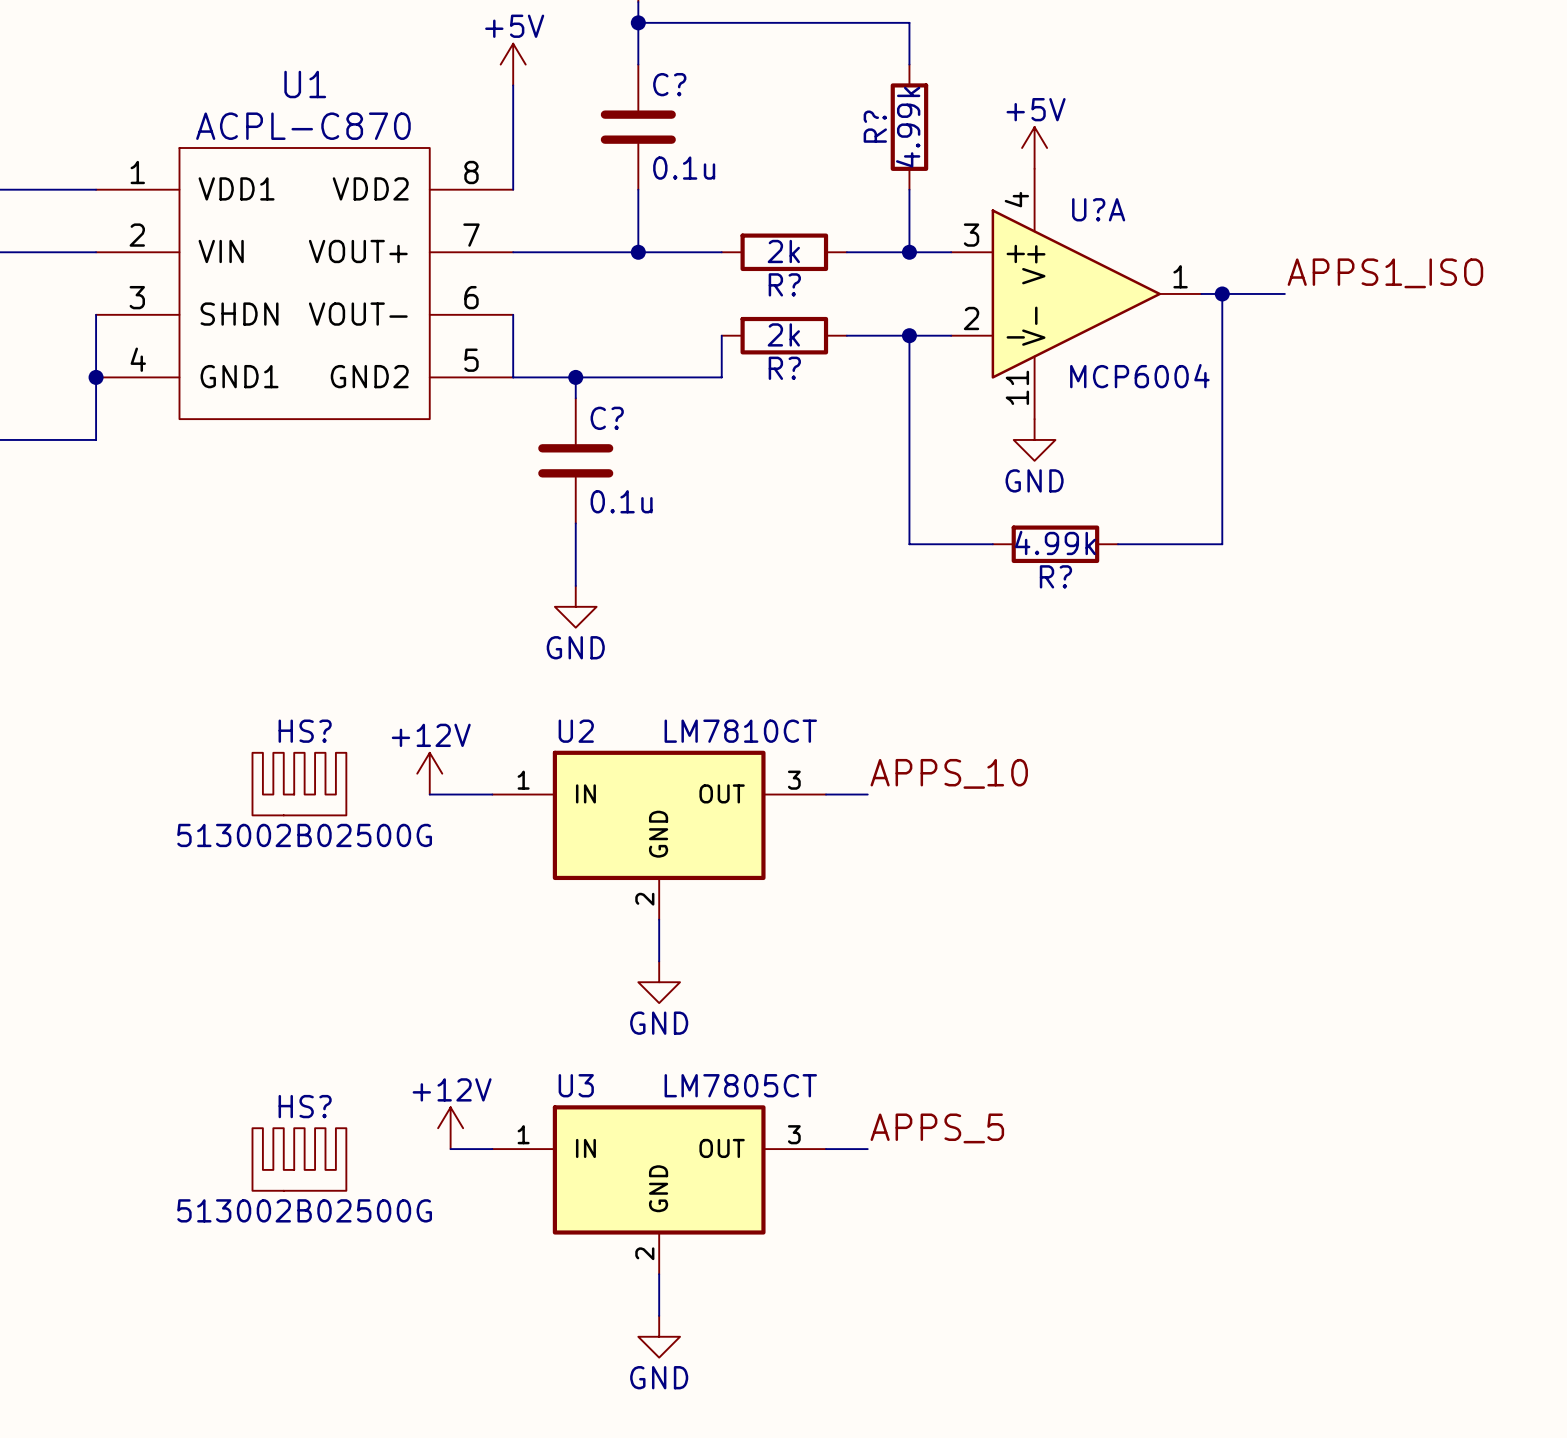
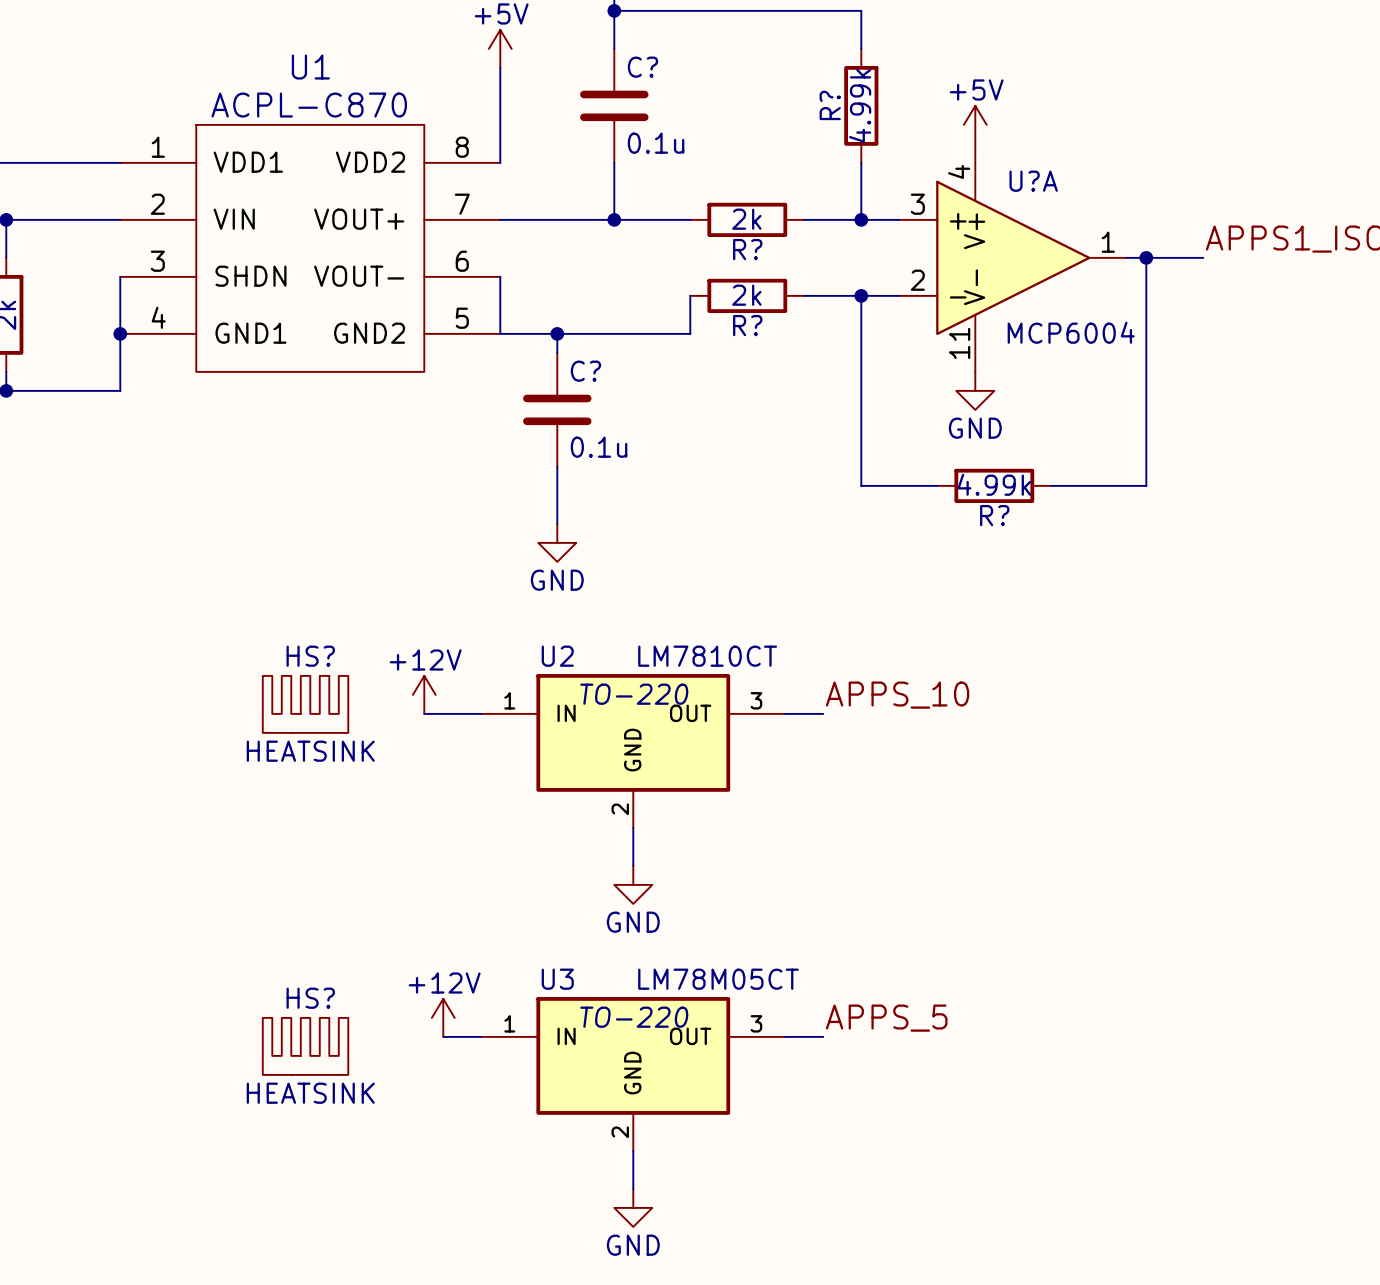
U2 text: none -> TO-220 (634, 694)
HS? value: 513002B02500G (304, 835) -> HEATSINK (310, 751)
U3 value: LM7805CT (740, 1085) -> LM78M05CT (718, 979)
U3 text: none -> TO-220 (634, 1017)
HS? value: 513002B02500G (304, 1210) -> HEATSINK (310, 1093)

